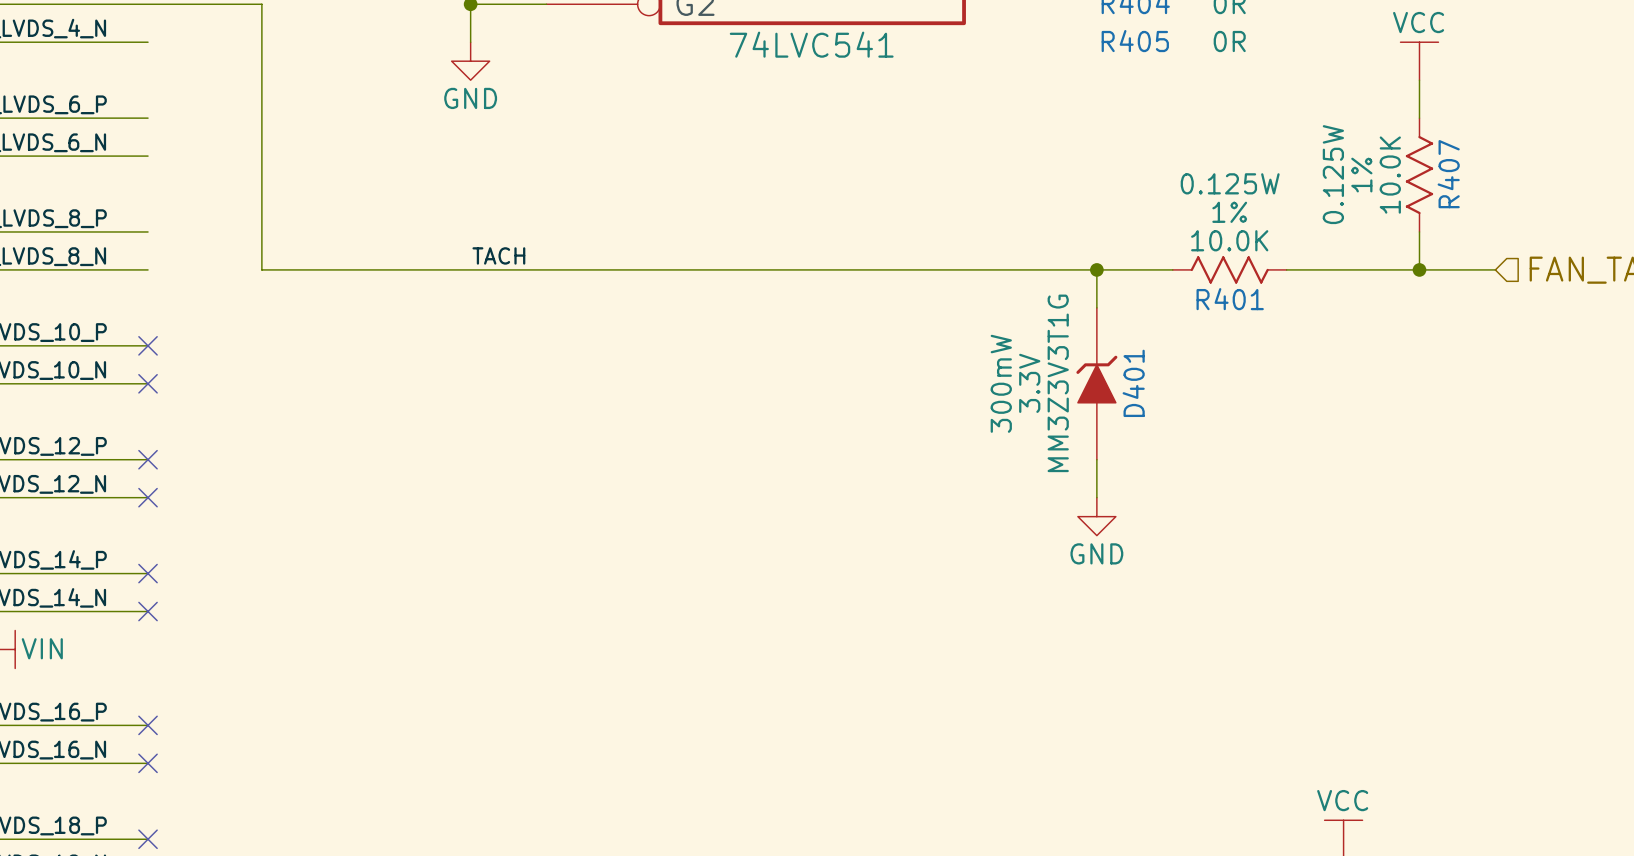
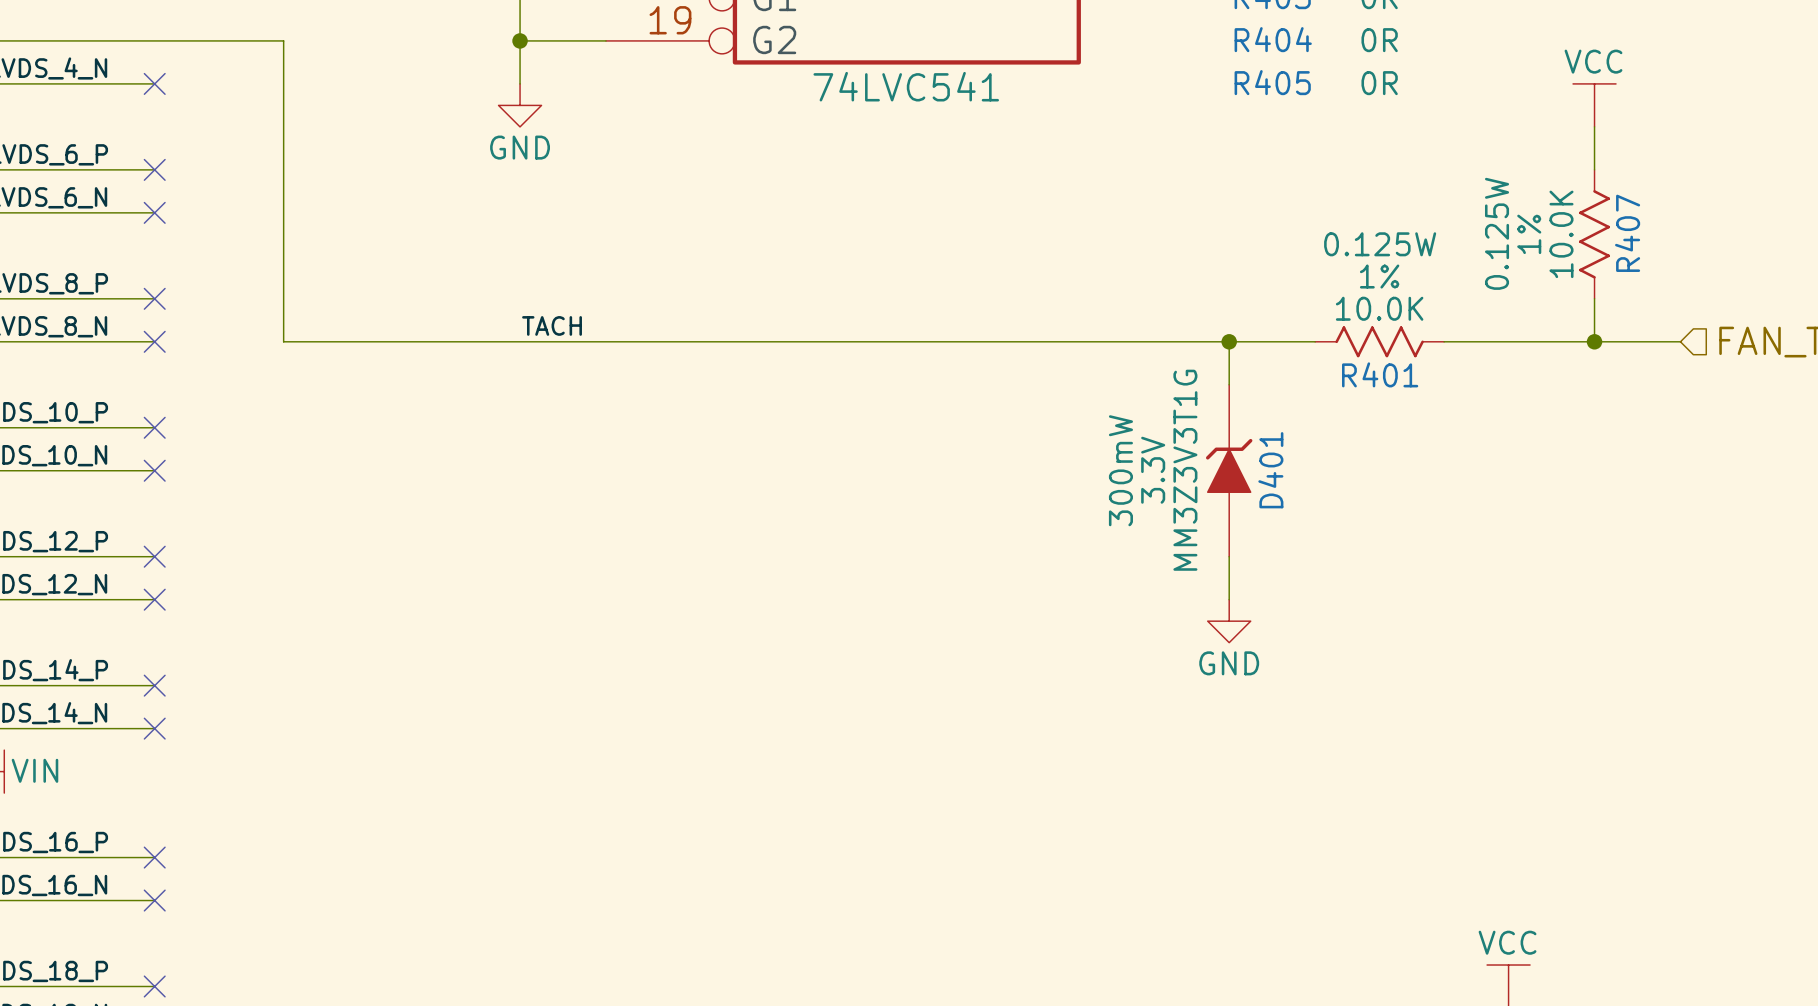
no-connect mark: none -> (154, 83)
no-connect mark: none -> (154, 169)
no-connect mark: none -> (154, 212)
no-connect mark: none -> (154, 298)
no-connect mark: none -> (154, 341)

